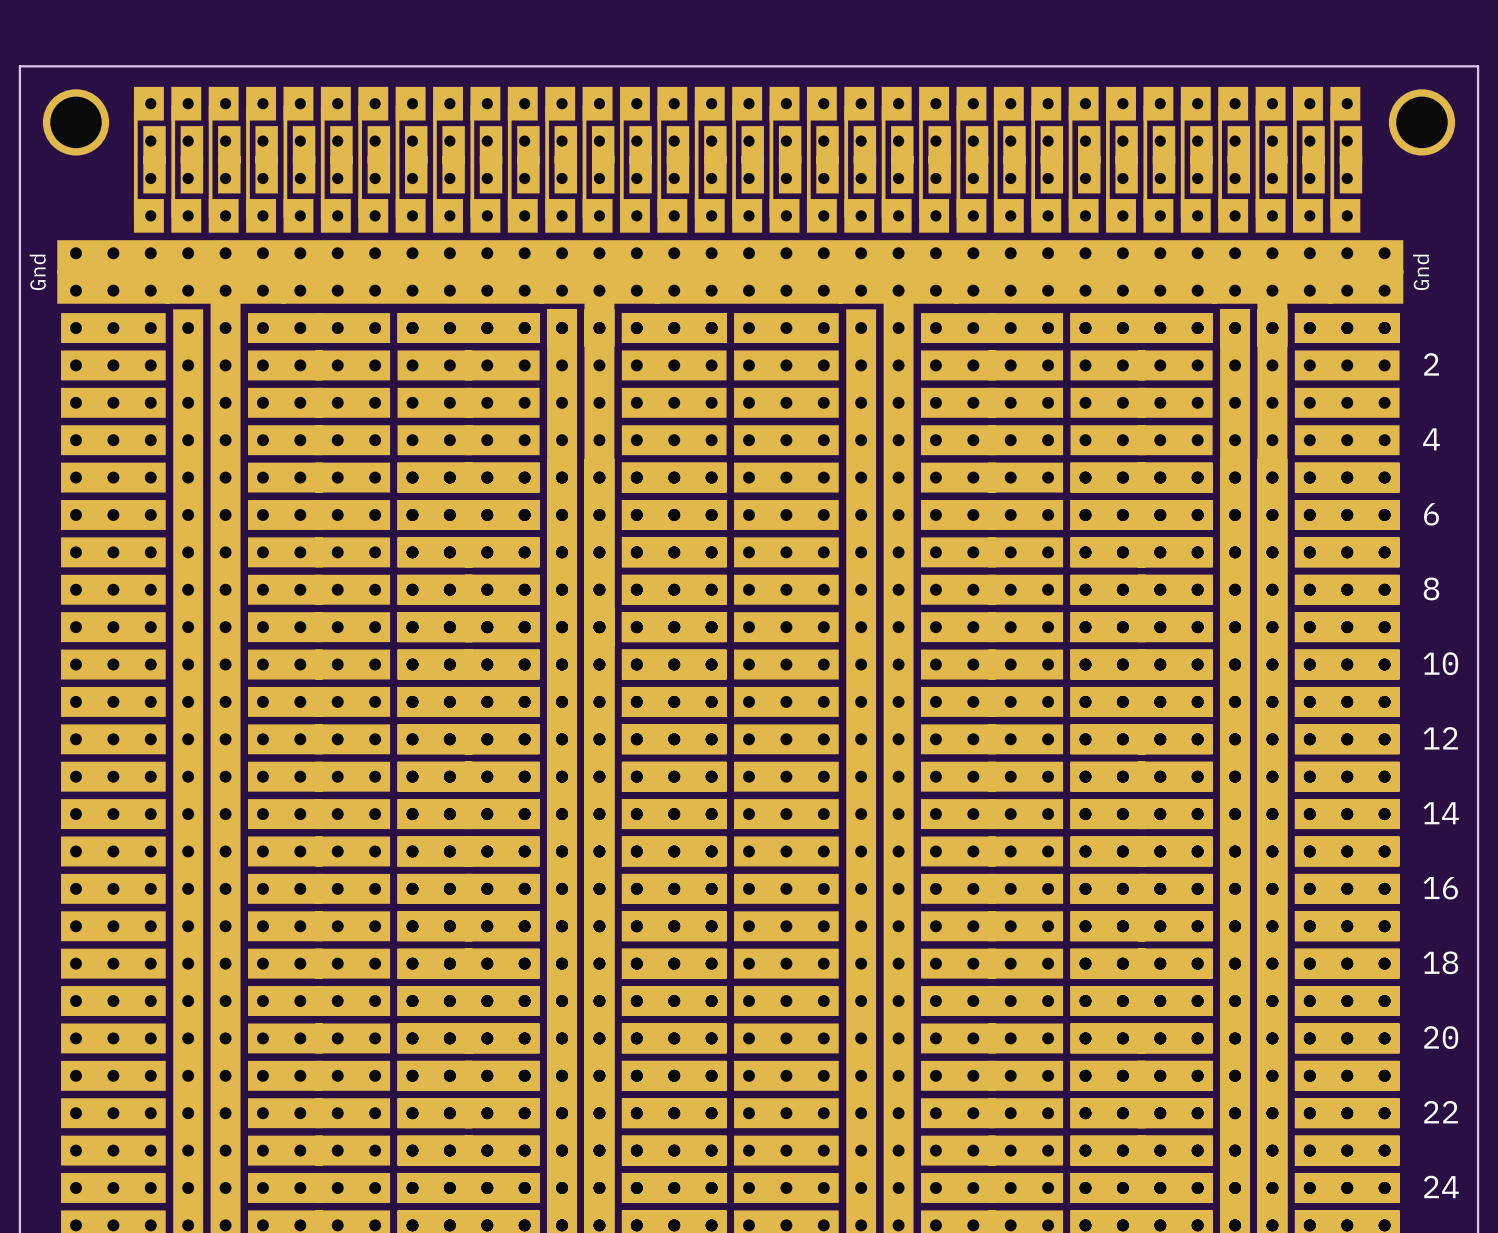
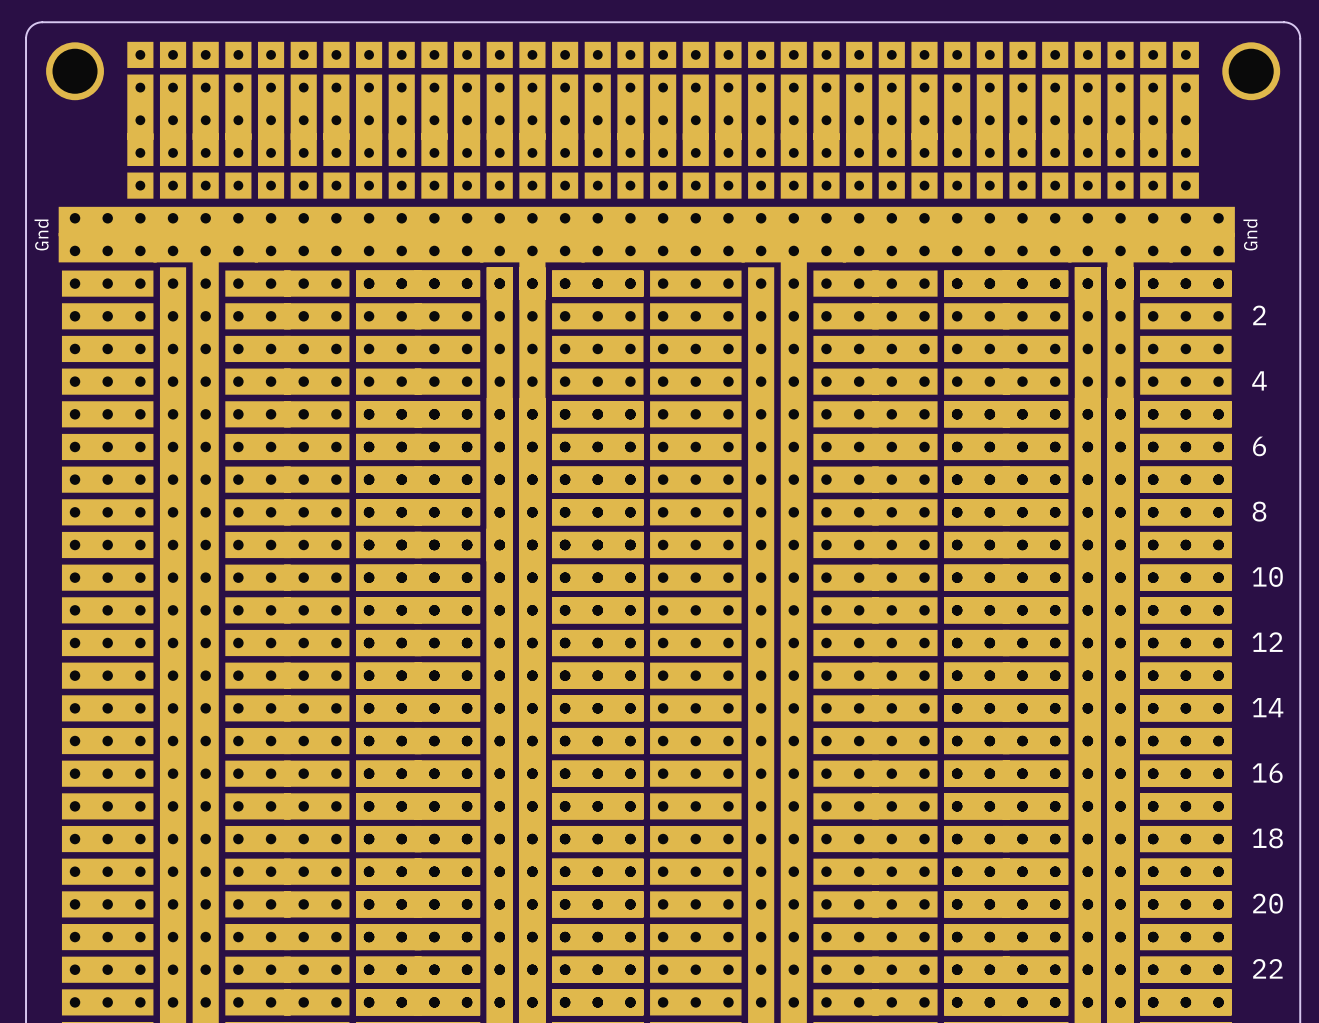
board edge: (1478, 66) (19, 66) -> (1300, 54) (1300, 36) (1298, 30) (1292, 24) (1283, 22) (42, 22) (34, 24) (28, 30) (26, 36) (26, 54)
part position: (76, 122) -> (75, 71)
part position: (1422, 122) -> (1251, 71)
part: none -> (140, 120)
part: none -> (173, 120)
part: none -> (205, 120)
part: none -> (238, 120)
part: none -> (271, 120)
part: none -> (303, 120)
part: none -> (336, 120)
part: none -> (369, 120)
part: none -> (401, 120)
part: none -> (434, 120)
part: none -> (467, 120)
part: none -> (499, 120)
part: none -> (532, 120)
part: none -> (565, 120)
part: none -> (597, 120)
part: none -> (630, 120)
part: none -> (663, 120)
part: none -> (695, 120)
part: none -> (728, 120)
part: none -> (761, 120)
part: none -> (793, 120)
part: none -> (826, 120)
part: none -> (859, 120)
part: none -> (891, 120)
part: none -> (924, 120)
part: none -> (957, 120)
part: none -> (989, 120)
part: none -> (1022, 120)
part: none -> (1055, 120)
part: none -> (1087, 120)
part: none -> (1120, 120)
part: none -> (1153, 120)
part: none -> (1185, 120)
part: (149, 159) -> none
part: (187, 159) -> none
part: (224, 159) -> none
part: (262, 159) -> none
part: (299, 159) -> none
part: (336, 159) -> none
part: (374, 159) -> none
part: (411, 159) -> none
part: (448, 159) -> none
part: (486, 159) -> none
part: (523, 159) -> none
part: (561, 159) -> none
part: (598, 159) -> none
part: (635, 159) -> none
part: (673, 159) -> none
part: (710, 159) -> none
part: (748, 159) -> none
part: (785, 159) -> none
part: (822, 159) -> none
part: (860, 159) -> none
part: (897, 159) -> none
part: (935, 159) -> none
part: (972, 159) -> none
part: (1009, 159) -> none
part: (1047, 159) -> none
part: (1084, 159) -> none
part: (1121, 159) -> none
part: (1159, 159) -> none
part: (1196, 159) -> none
part: (1234, 159) -> none
part: (1271, 159) -> none
part: (1308, 159) -> none
part: (1346, 159) -> none

